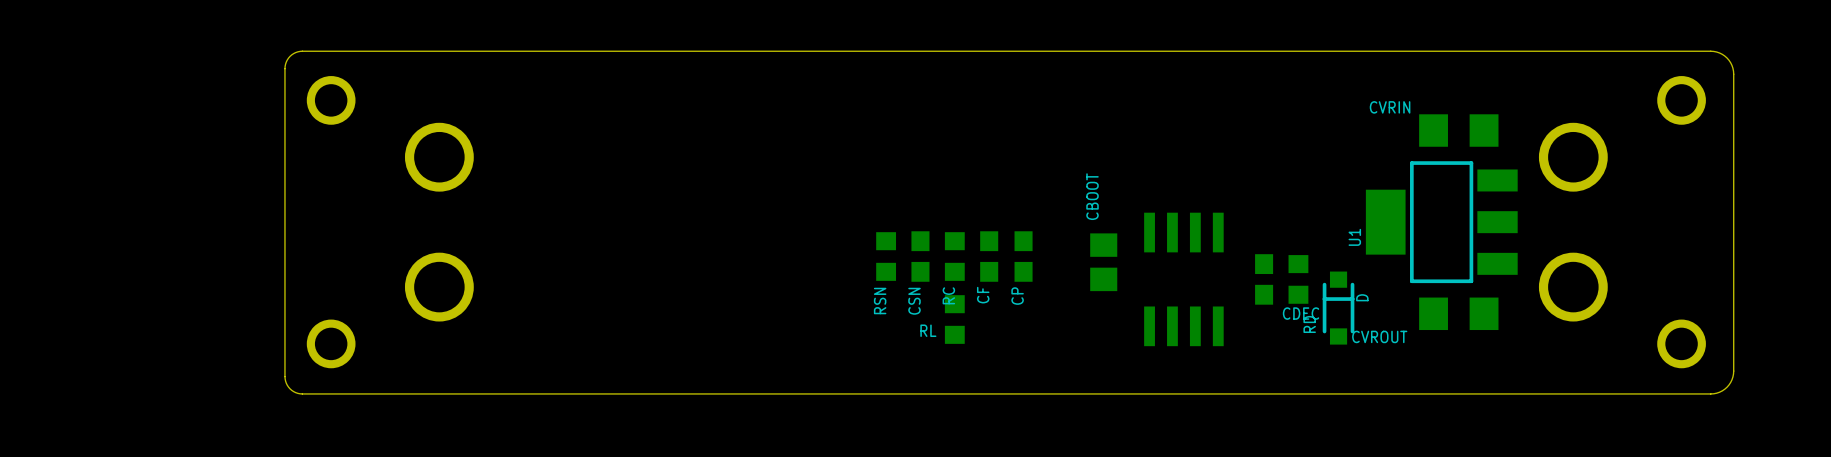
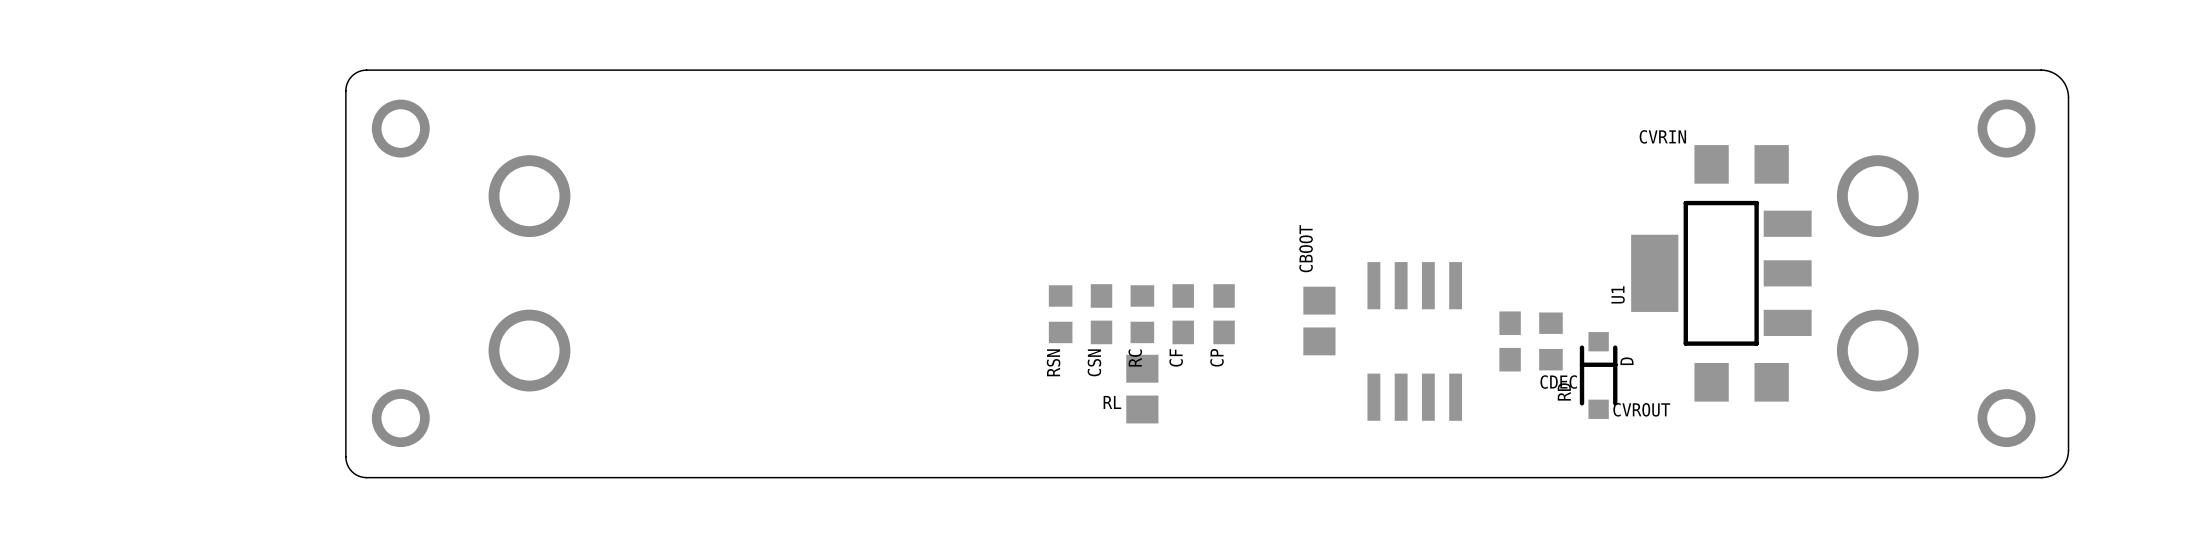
RL footprint: [944, 295, 965, 344] -> [1126, 354, 1159, 424]

